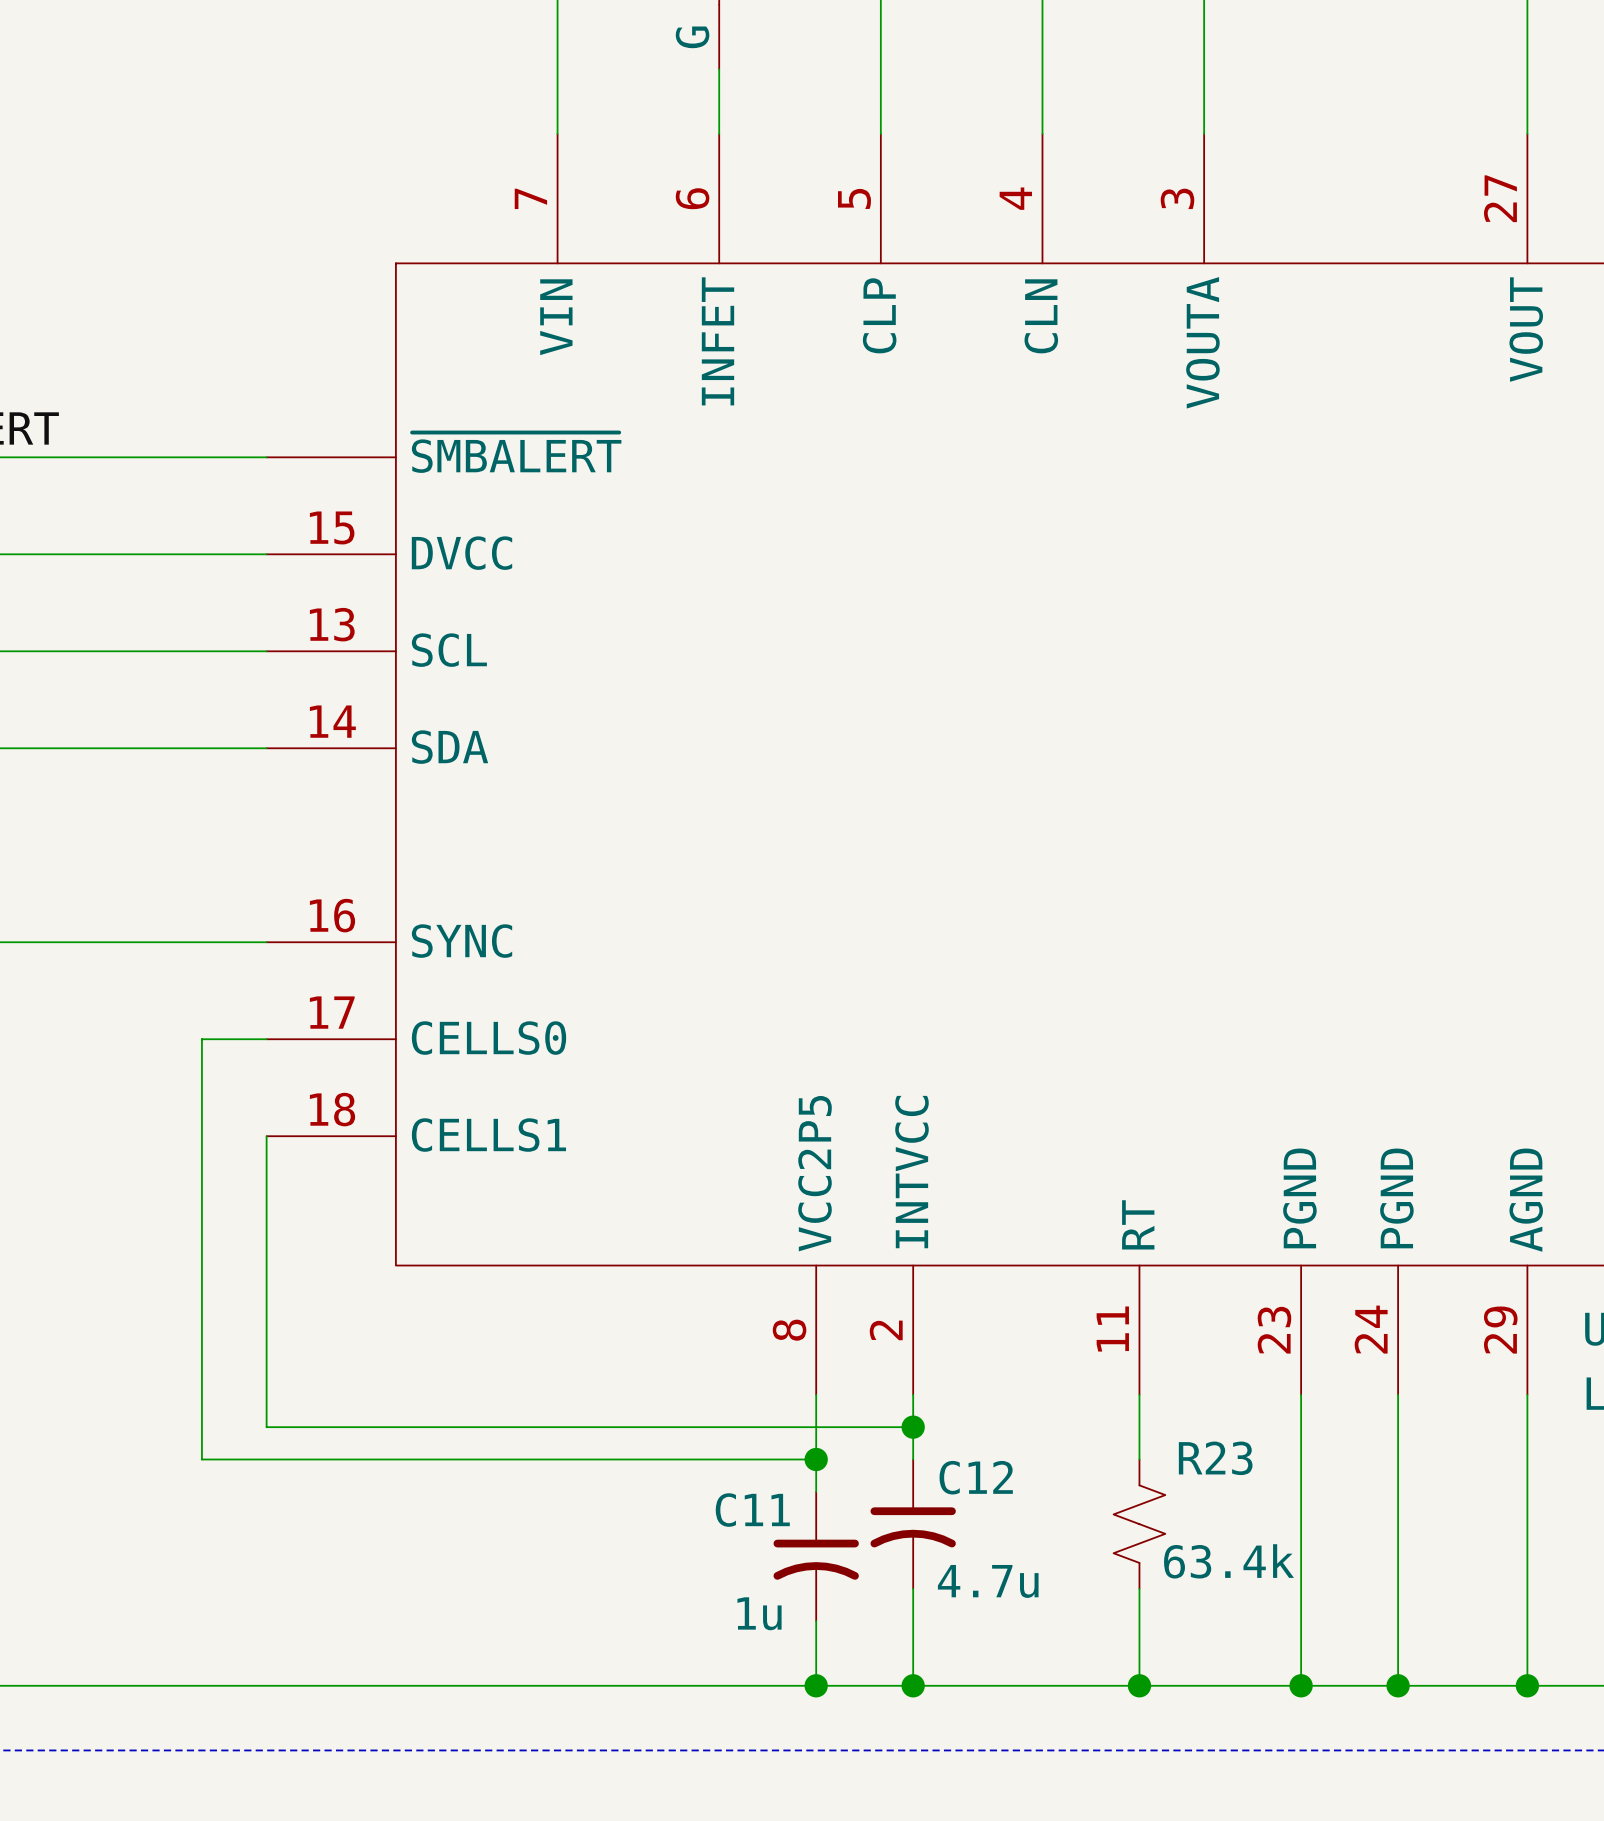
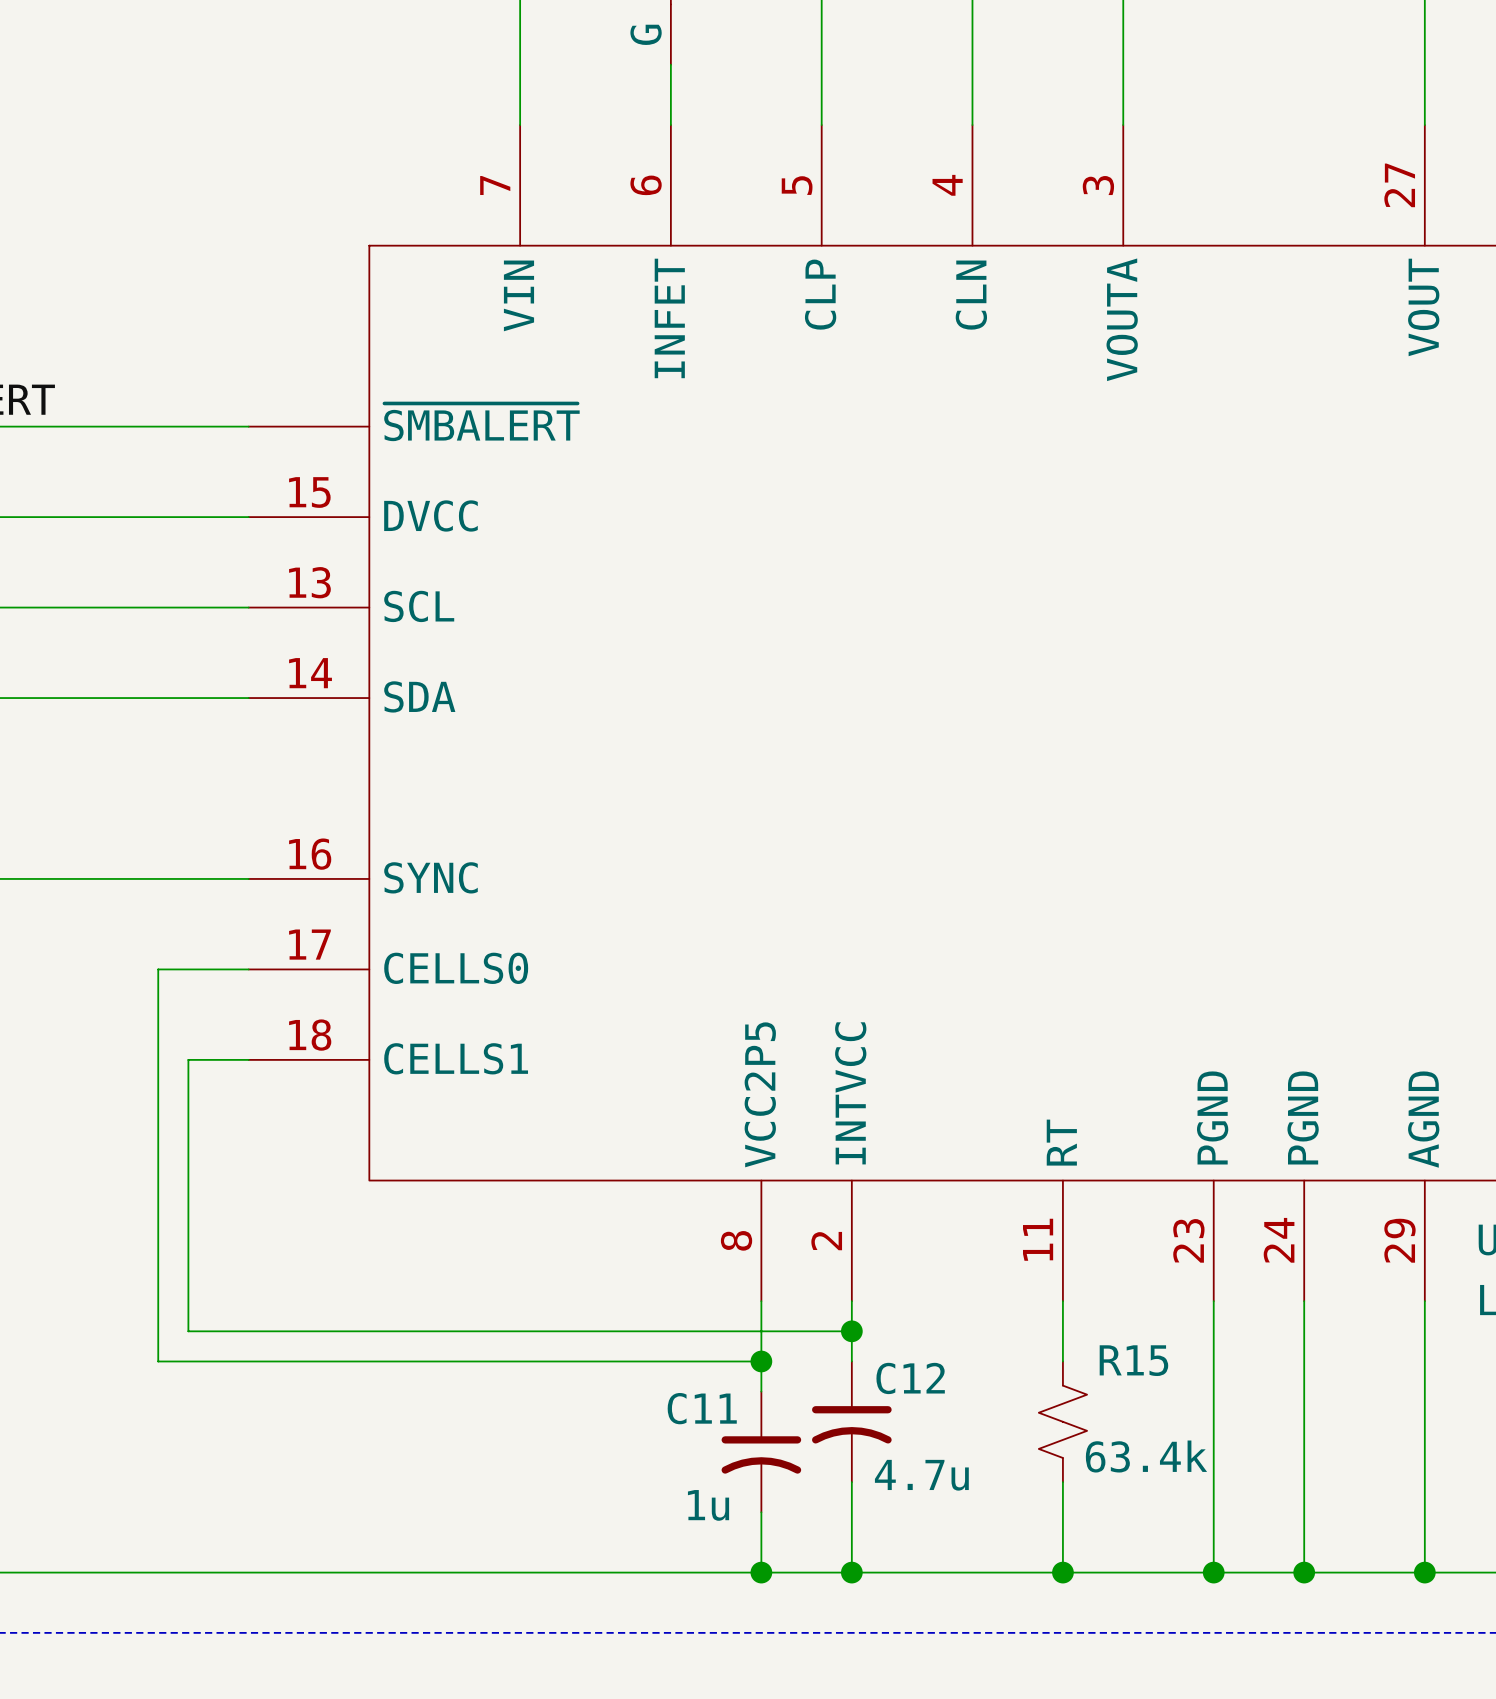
wire: (201, 1039) (201, 1136) -> (248, 1059) (188, 1059)
wire: none -> (188, 969) (158, 969) (158, 1361) (188, 1361)
wire: (266, 1136) (266, 1427) -> none
wire: (201, 1427) (201, 1459) -> (188, 1331) (248, 1331)
R23 name: R23 (1215, 1458) -> R15 (1133, 1360)

